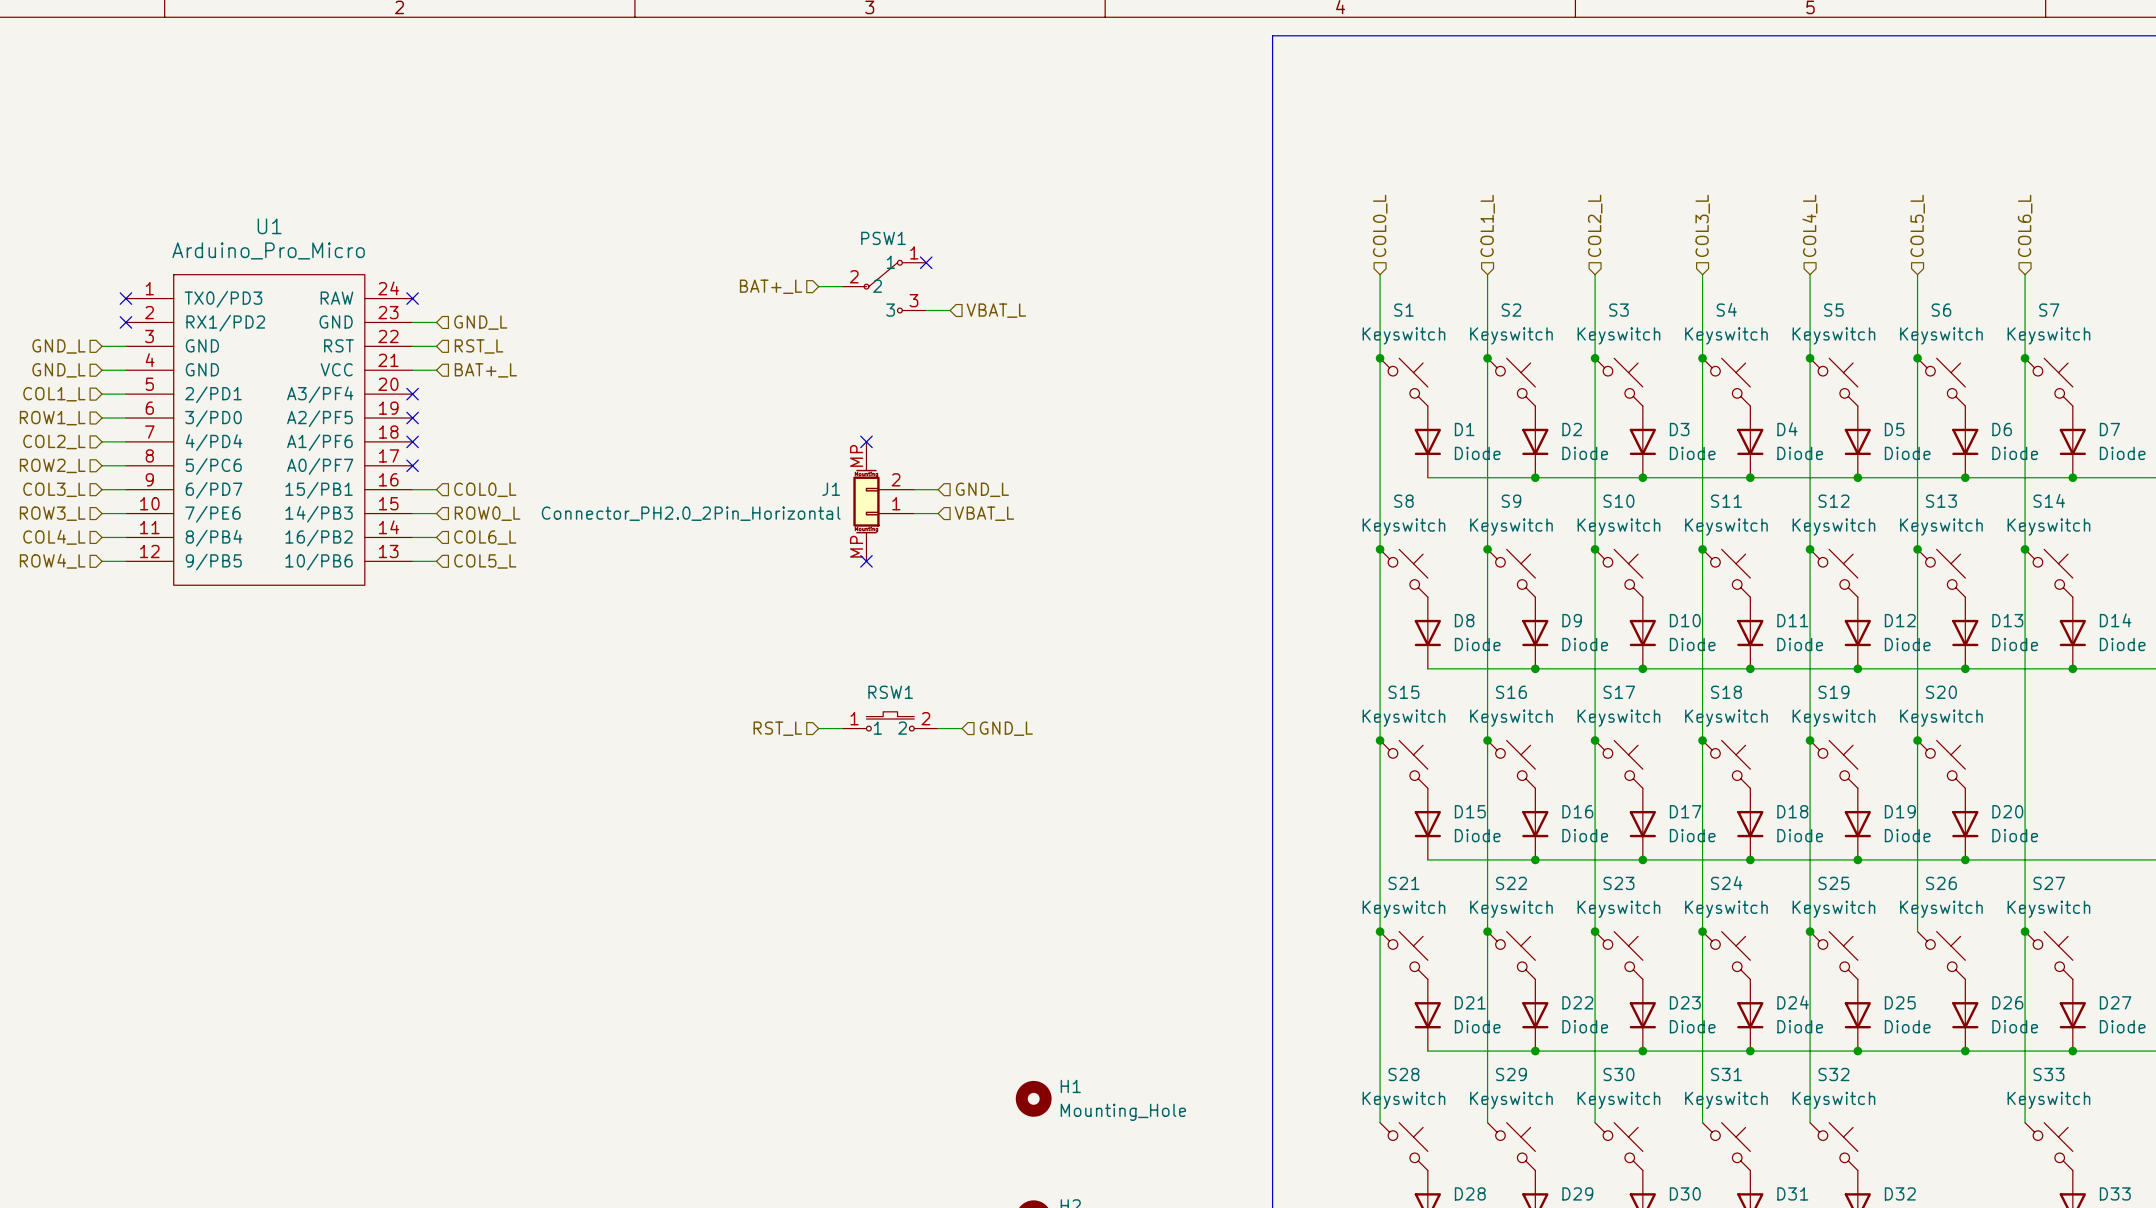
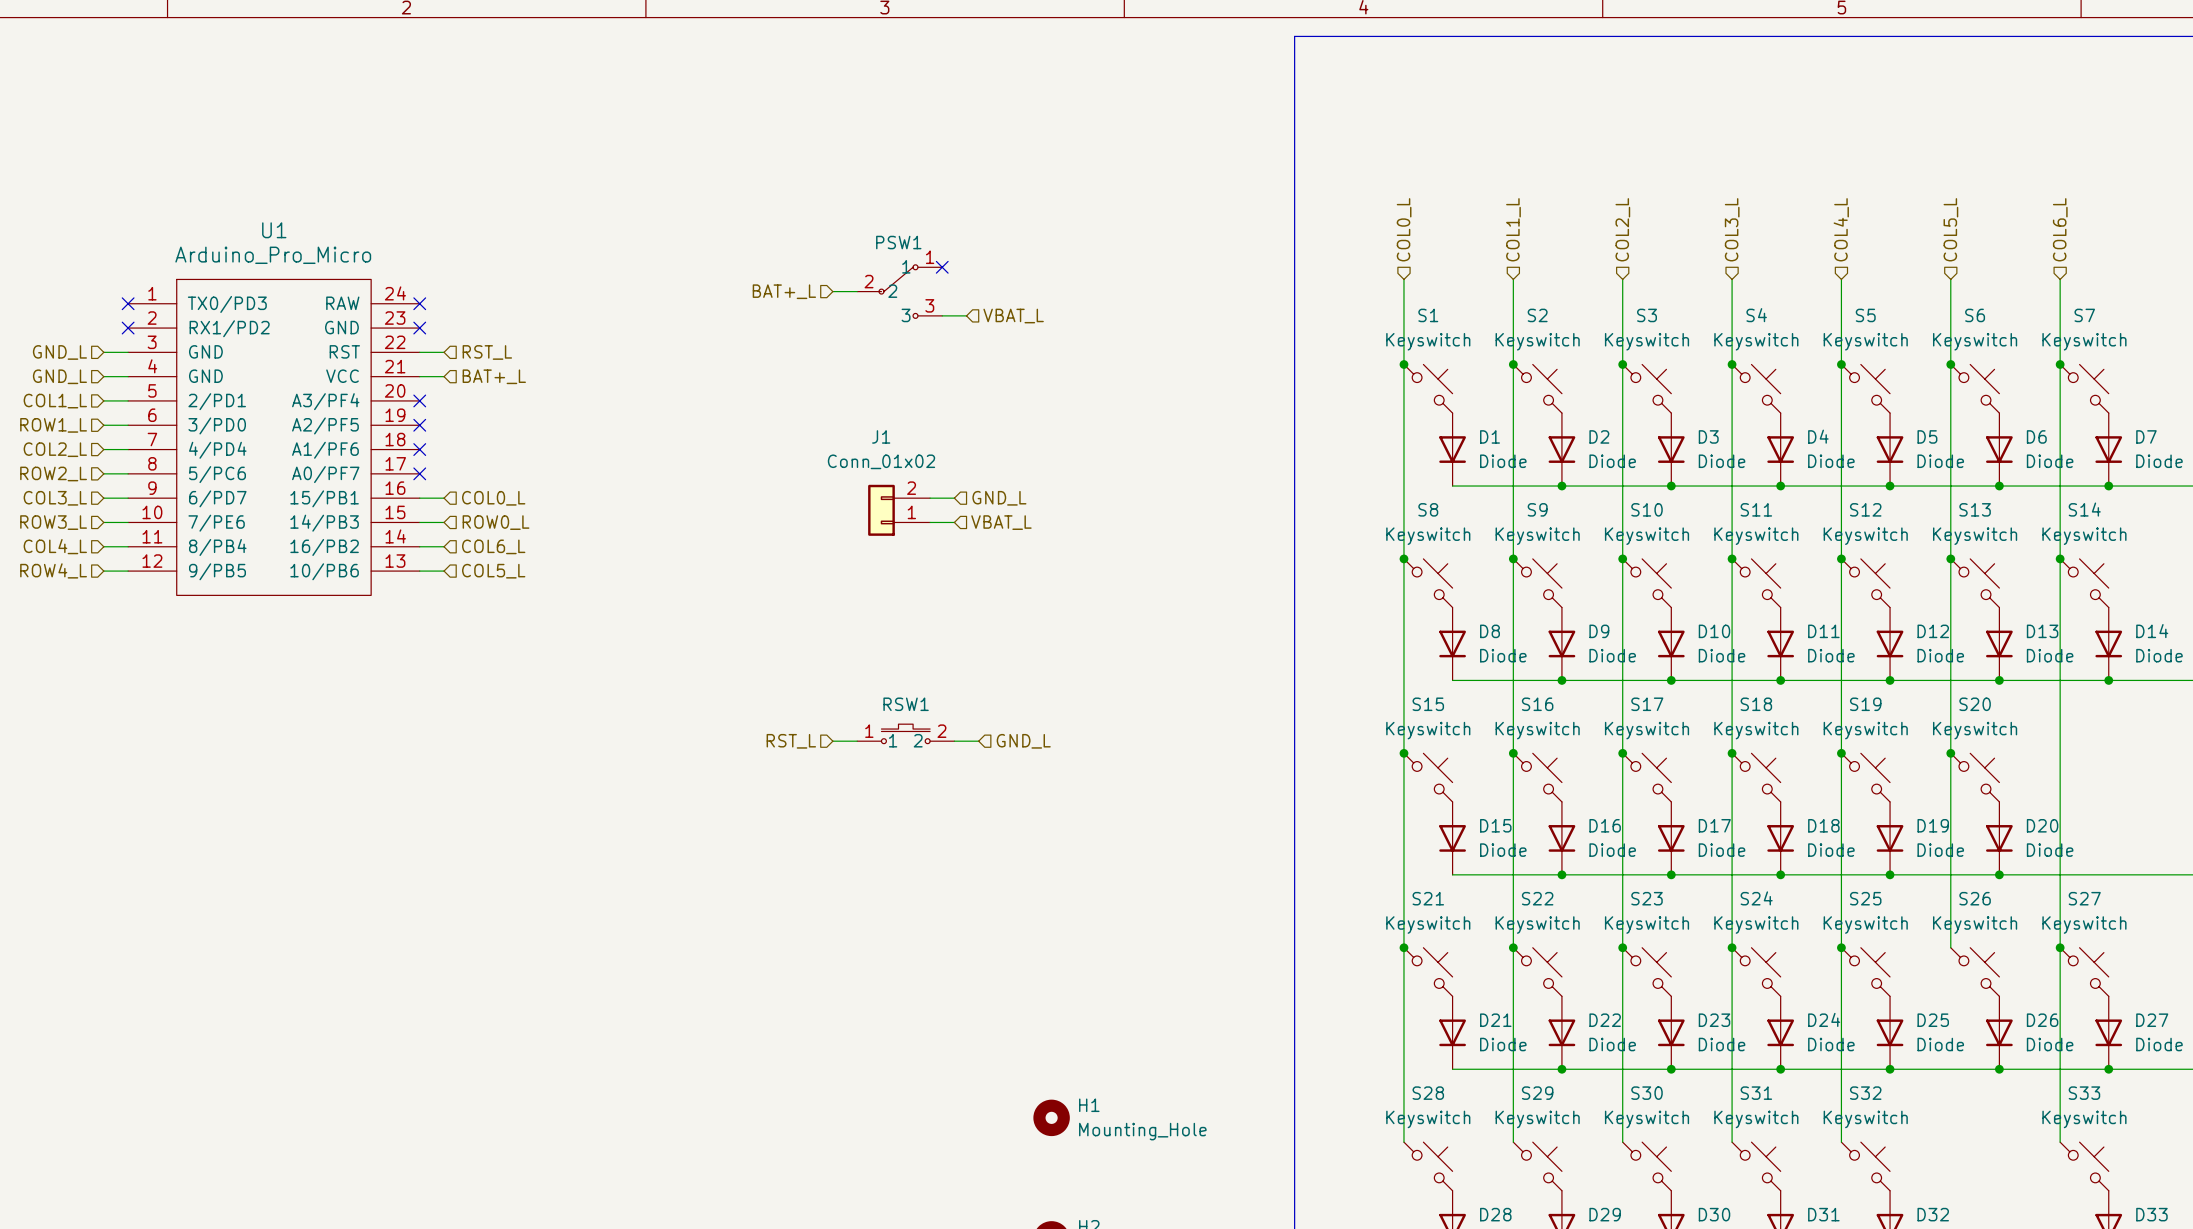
wire: (412, 322) (436, 322) -> none
no-connect mark: none -> (419, 328)
hierarchical label: GND_L (480, 322) -> none
J1 symbol: [853, 441, 915, 562] -> [868, 484, 931, 536]
no-connect mark: (866, 441) -> none
J1 name position: J1 (831, 489) -> J1 (881, 436)
J1 value: Connector_PH2.0_2Pin_Horizontal (691, 513) -> Conn_01x02 (881, 461)
no-connect mark: (866, 561) -> none

